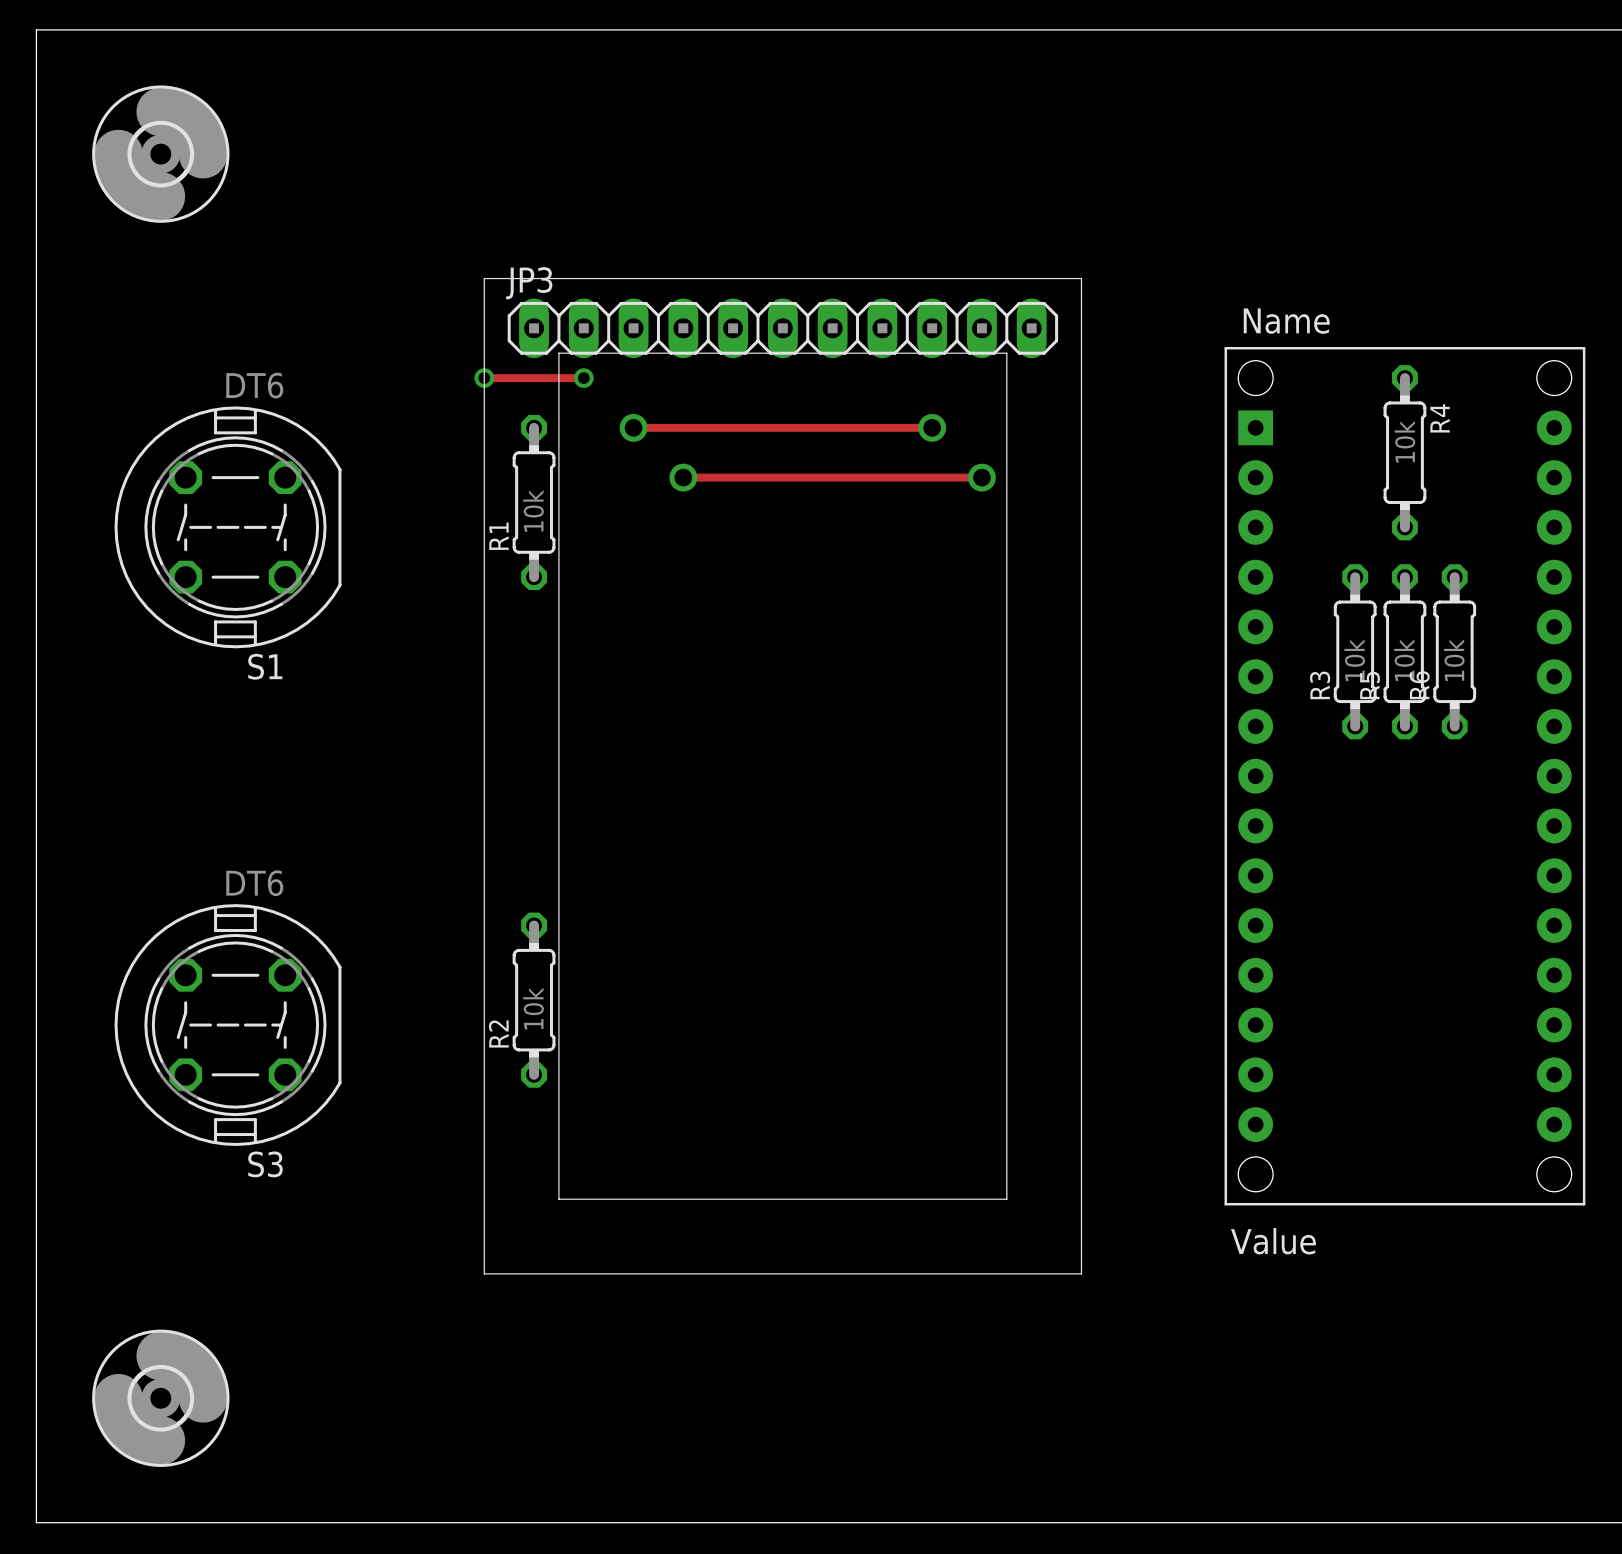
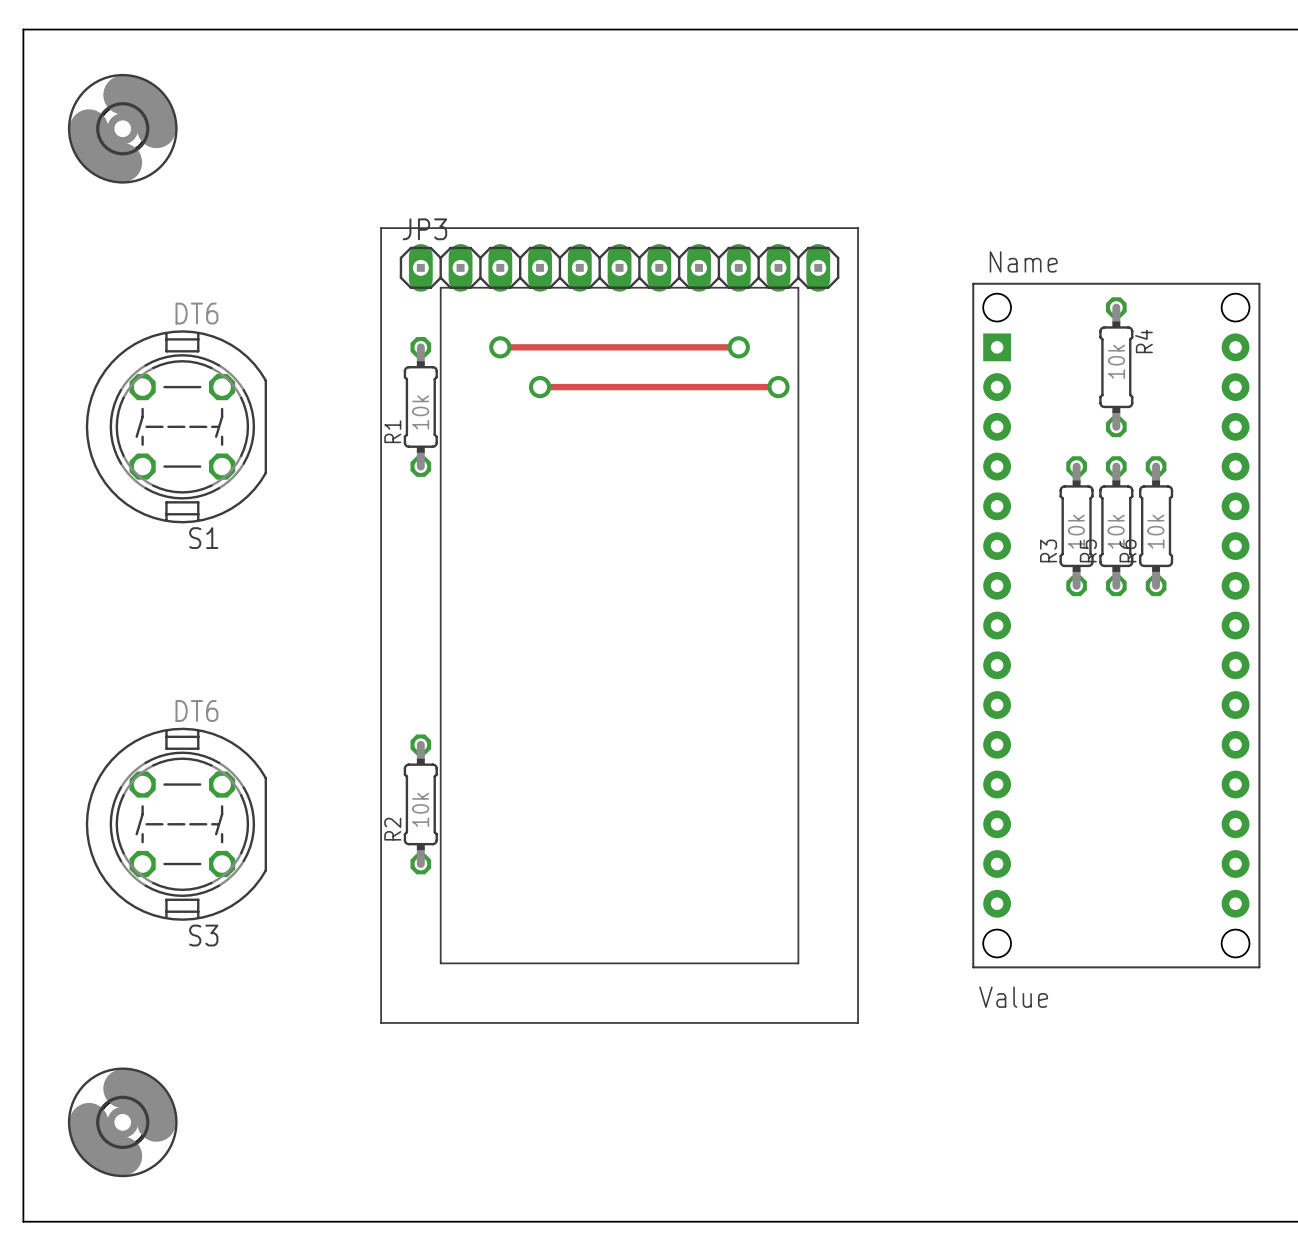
track: (484, 378) (583, 378) -> none
via: (484, 378) -> none
via: (583, 378) -> none

